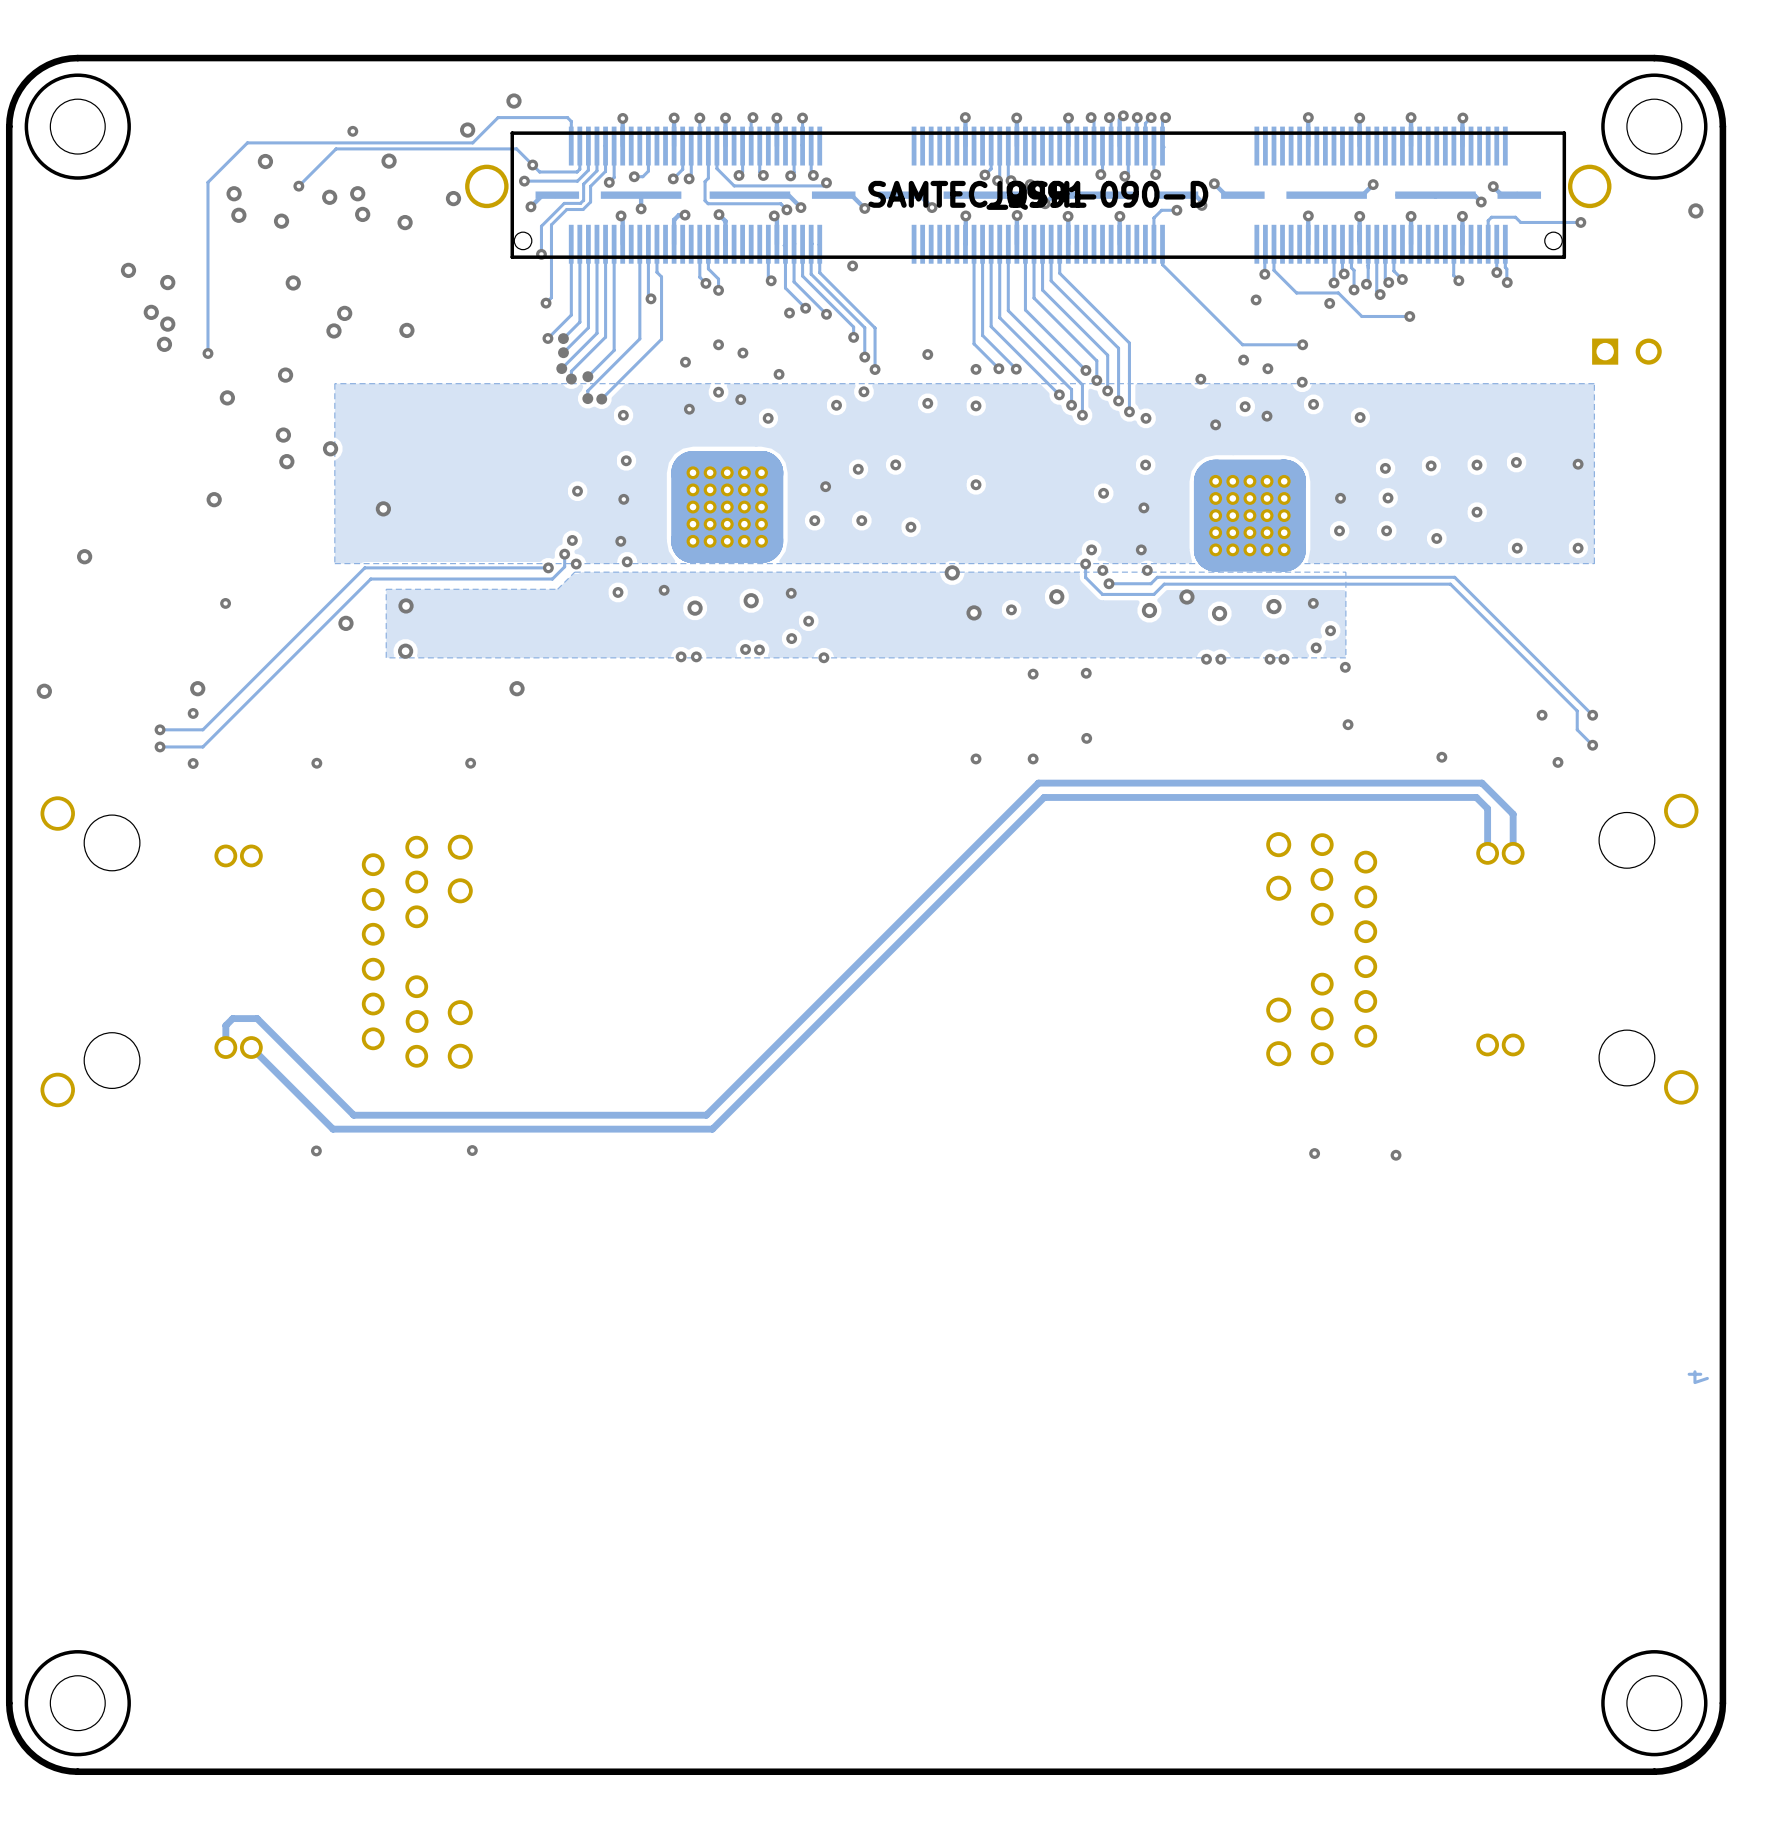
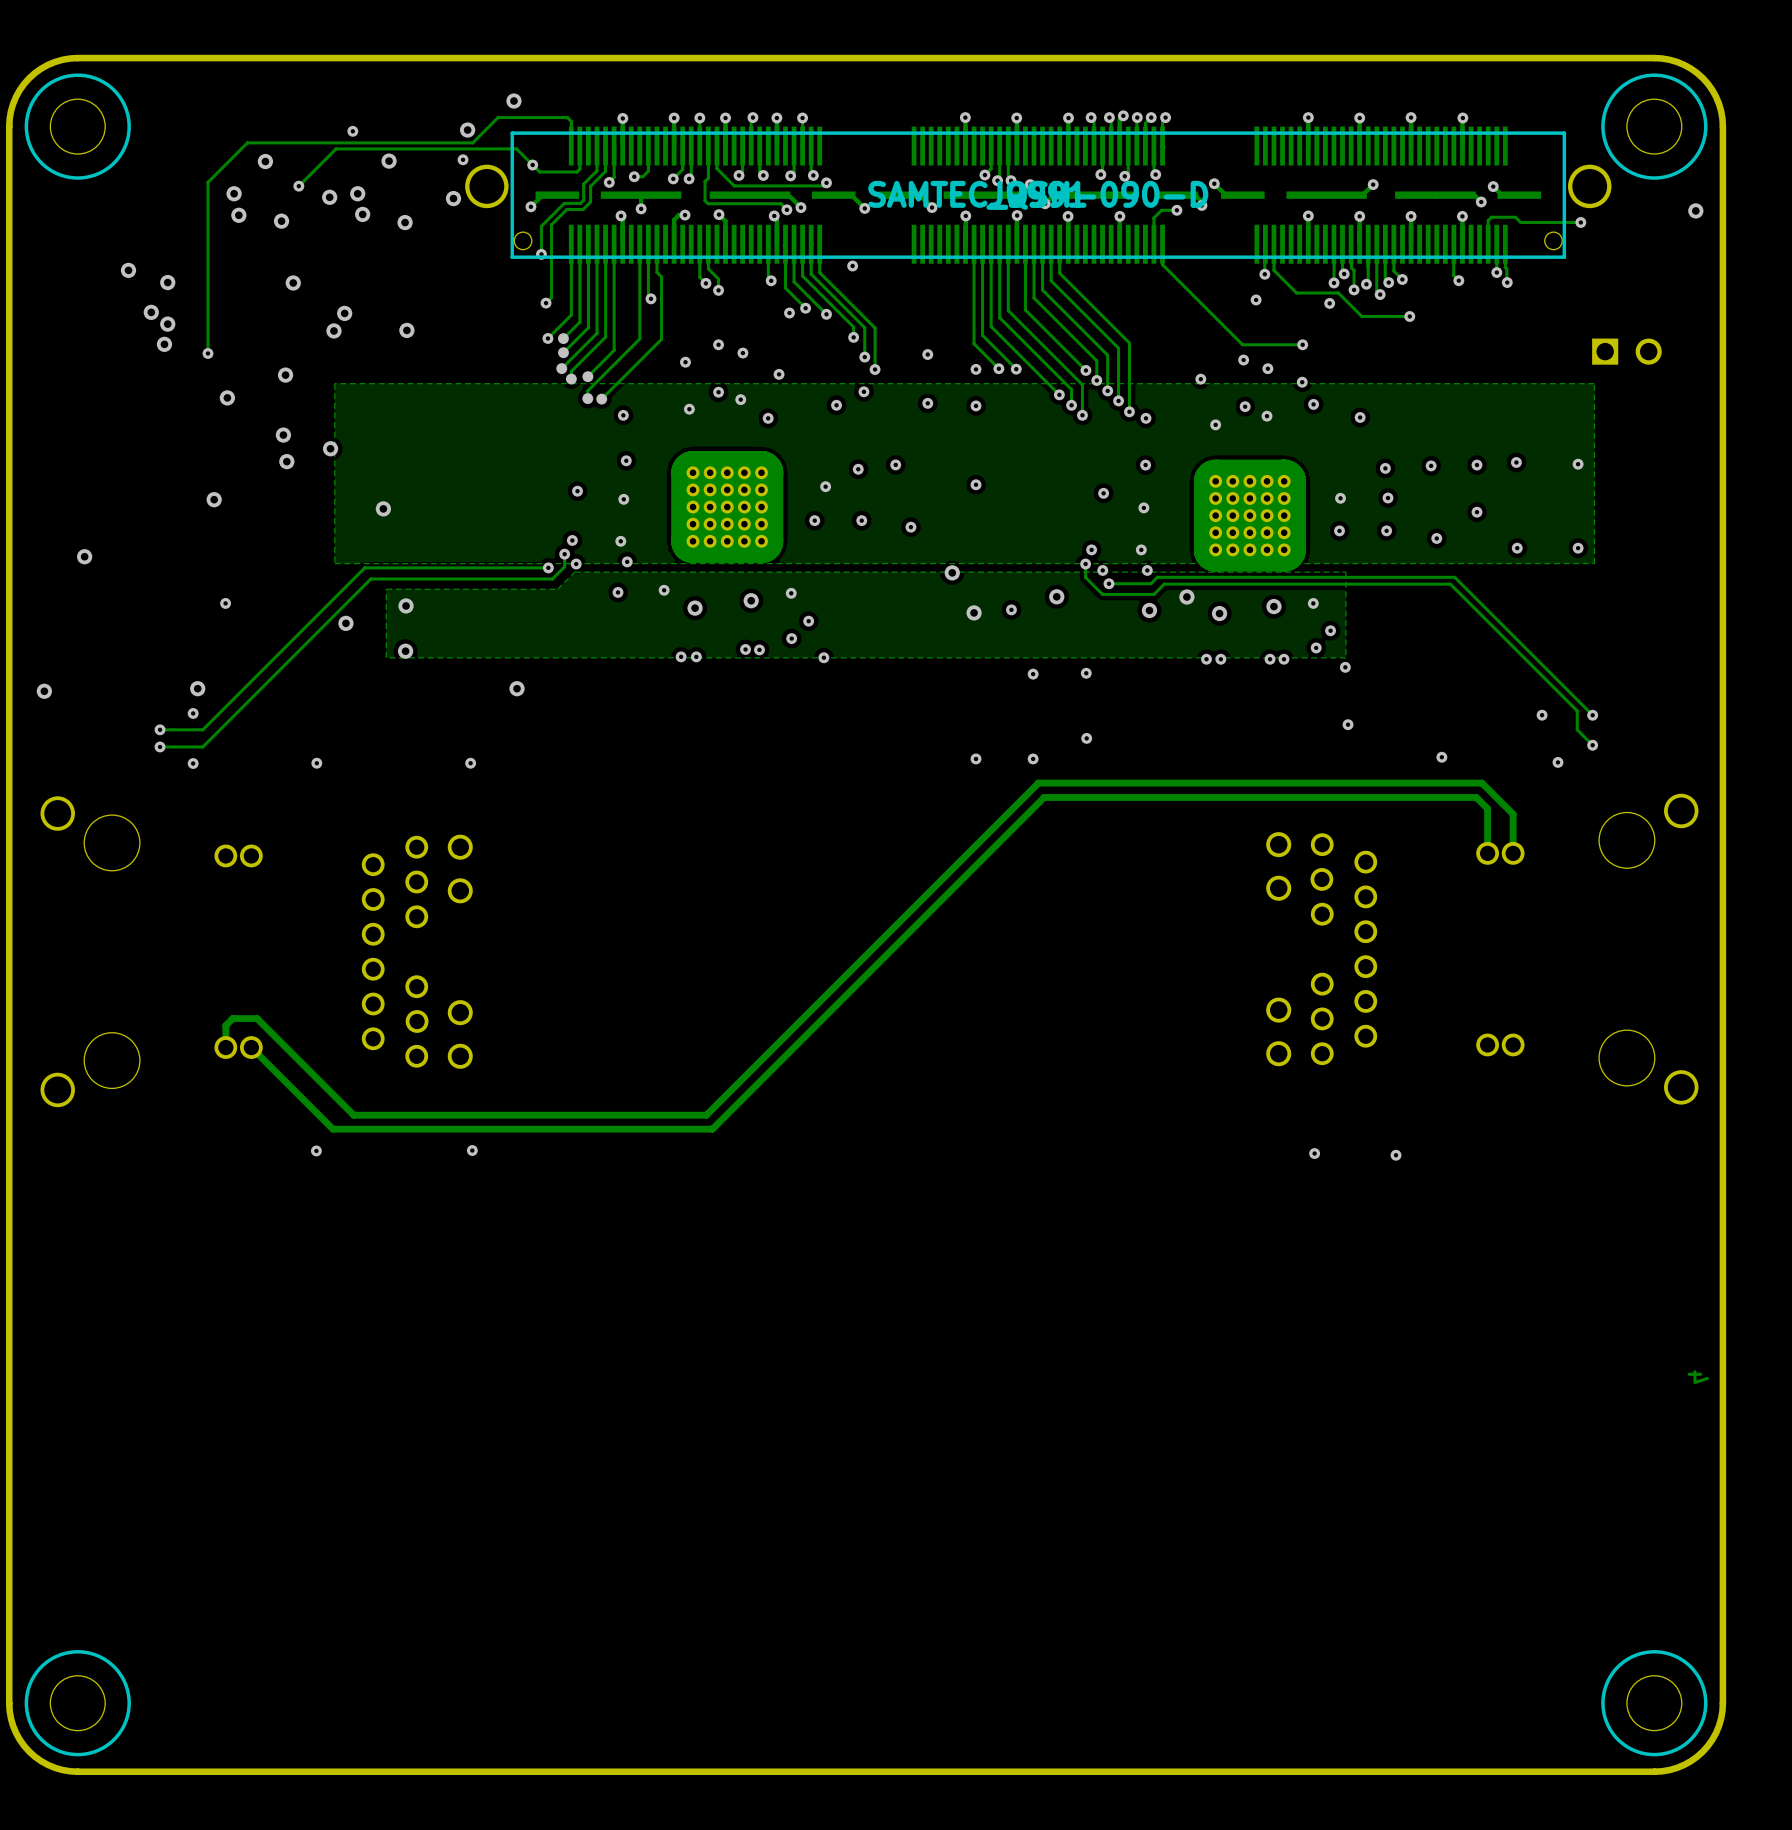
track: (588, 146) (588, 170) (577, 181) (524, 181) -> none
via position: (524, 181) -> (463, 159)

